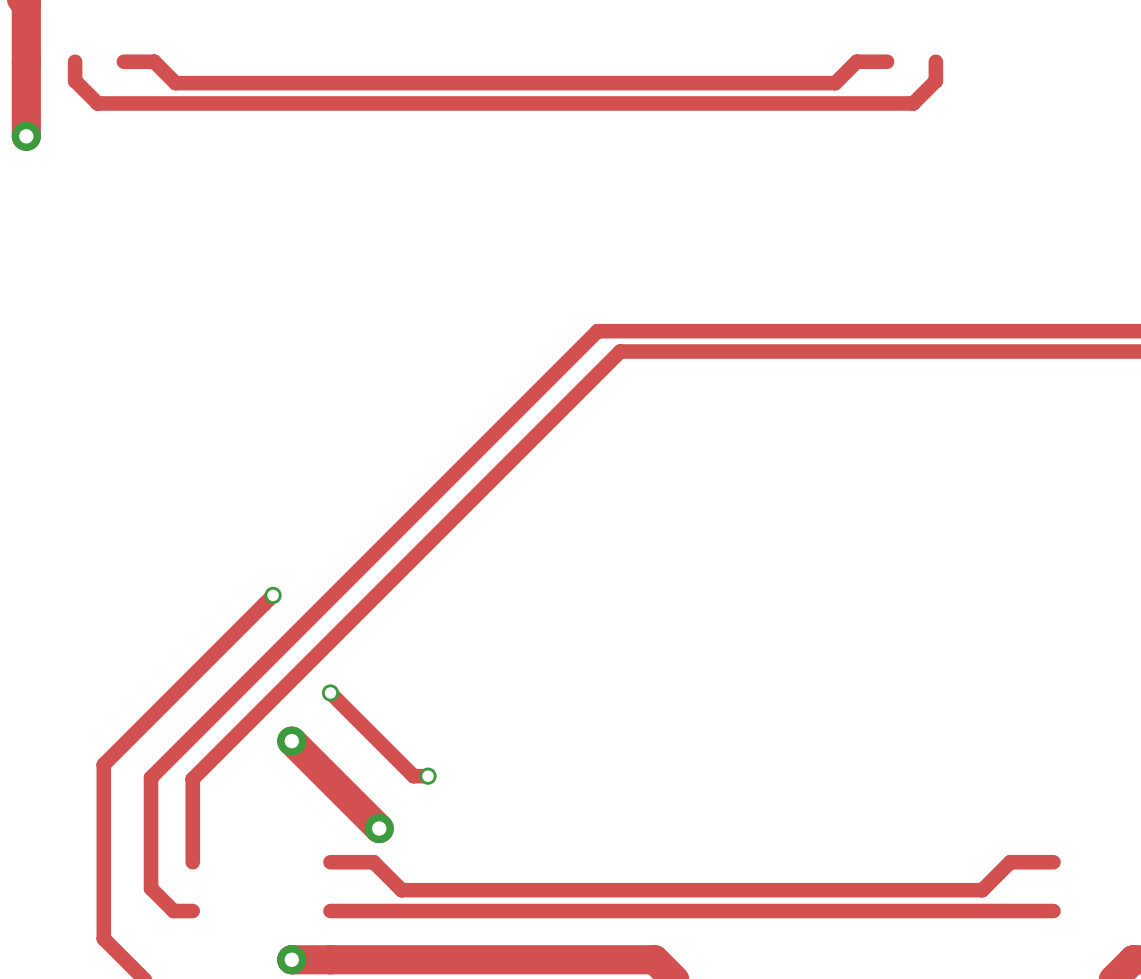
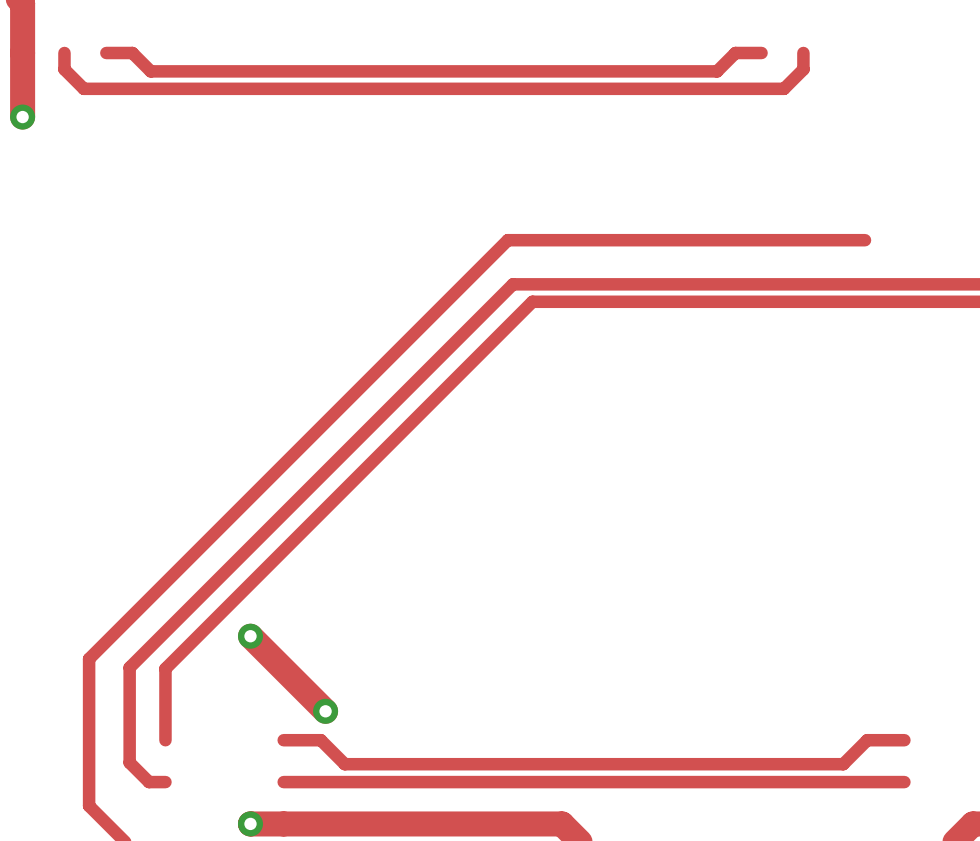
track: (273, 595) (103, 764) (103, 767) -> (865, 240) (507, 240) (89, 658)
via: (273, 595) -> none
track: (330, 692) (413, 776) (428, 776) -> none
via: (330, 692) -> none
via: (428, 776) -> none

